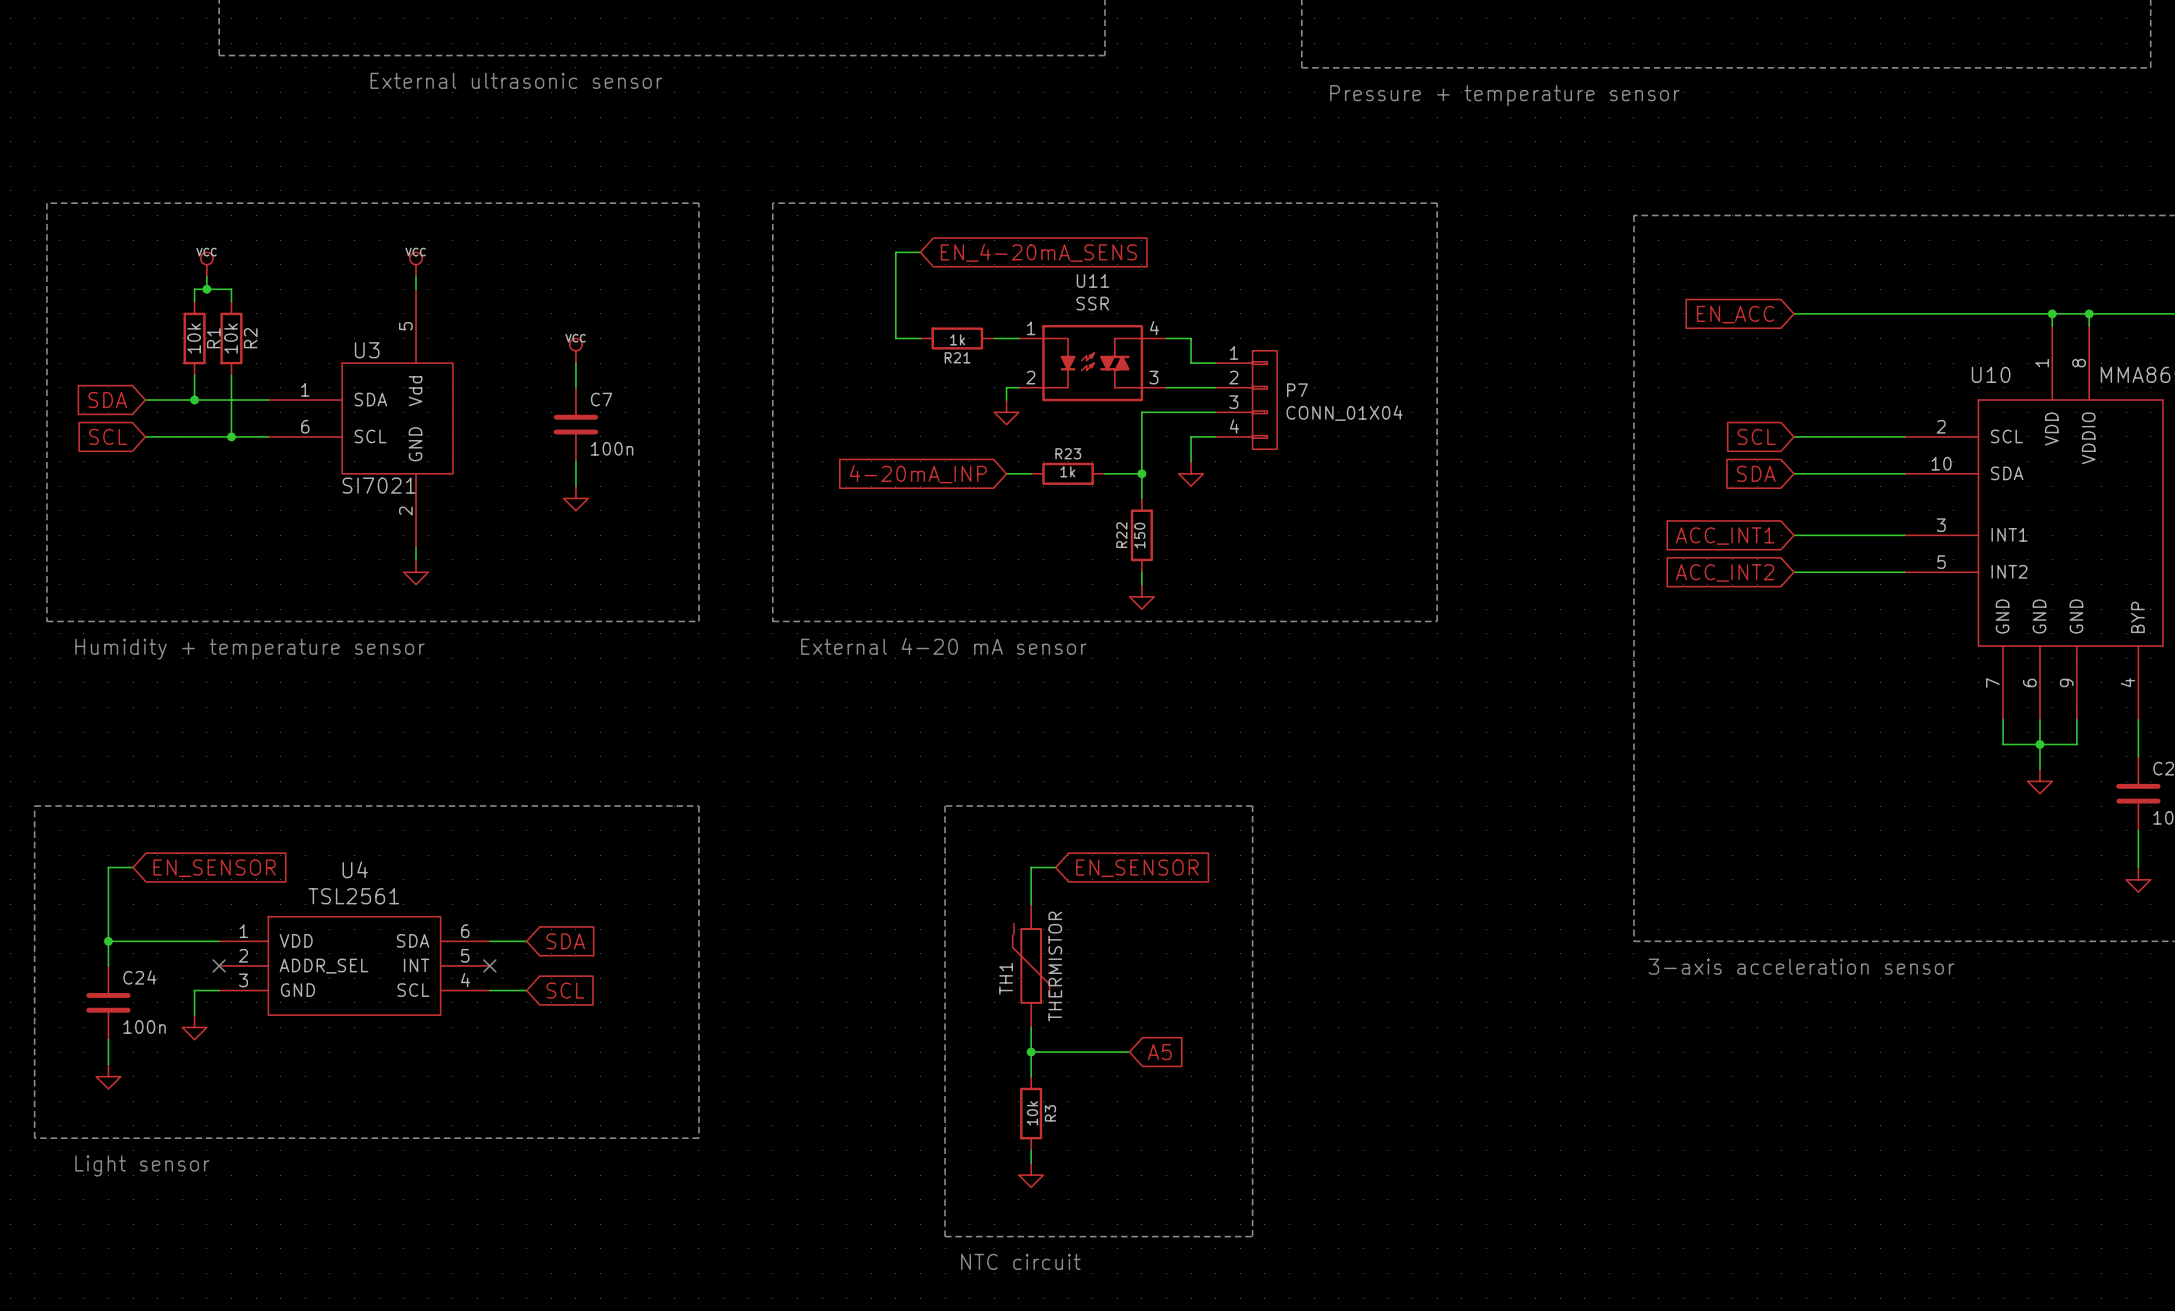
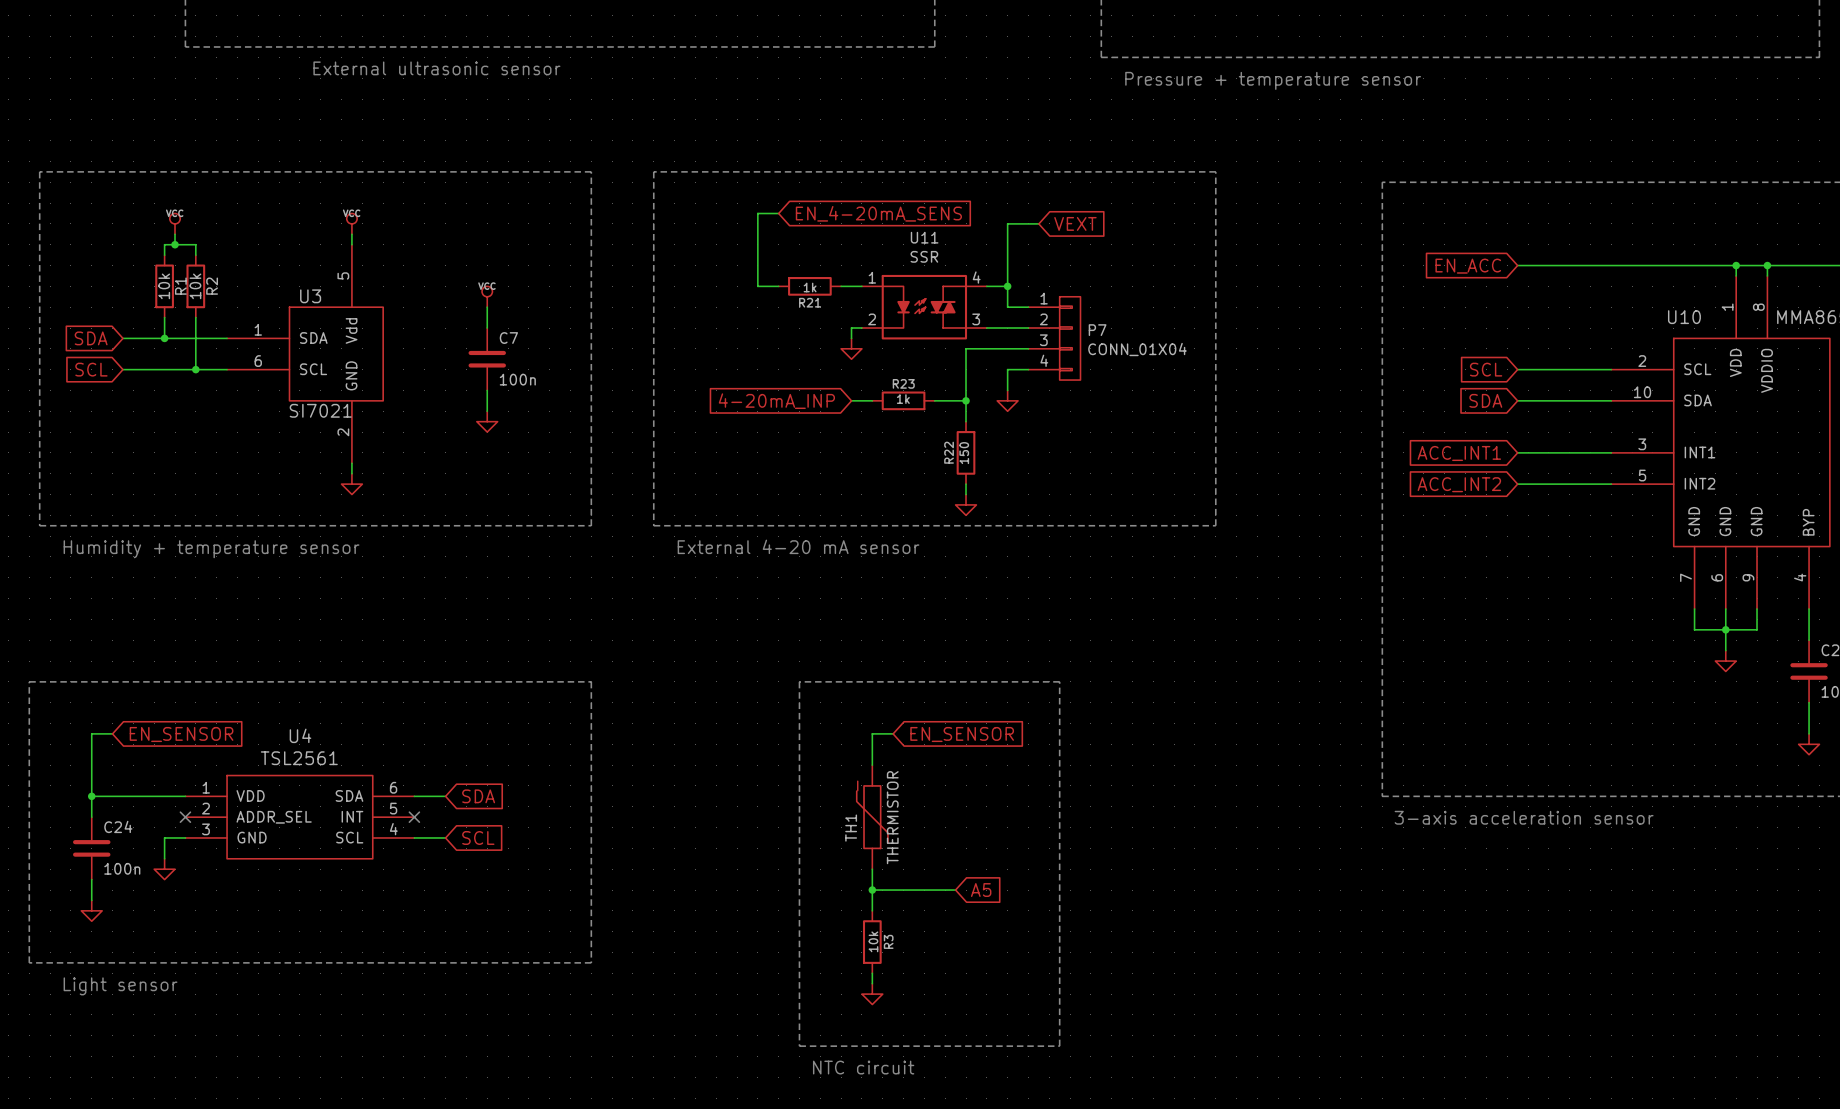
wire: none -> (1038, 223) (1007, 223) (1007, 286)
global label: none -> VEXT (1075, 223)
junction: none -> (1007, 286)

